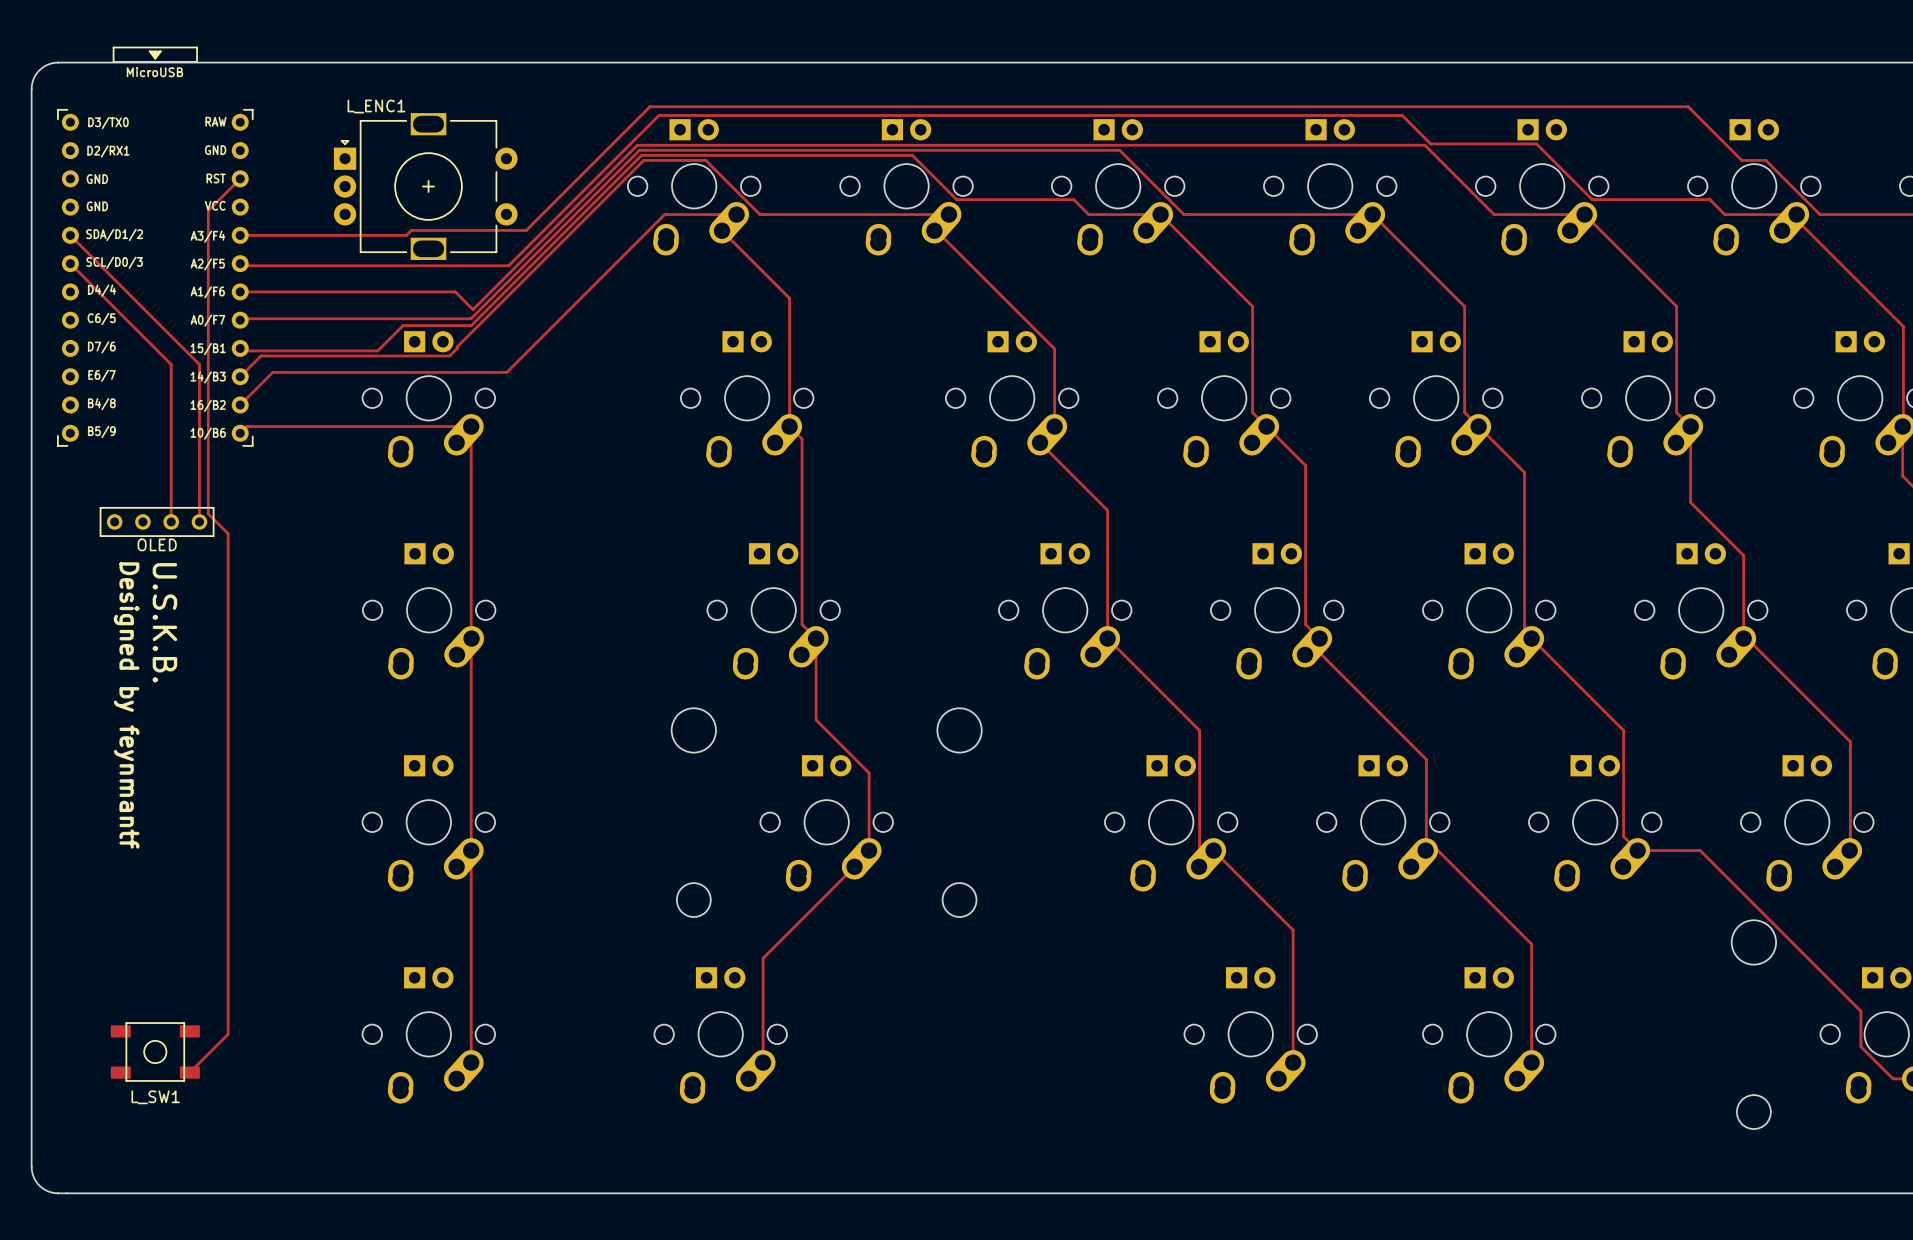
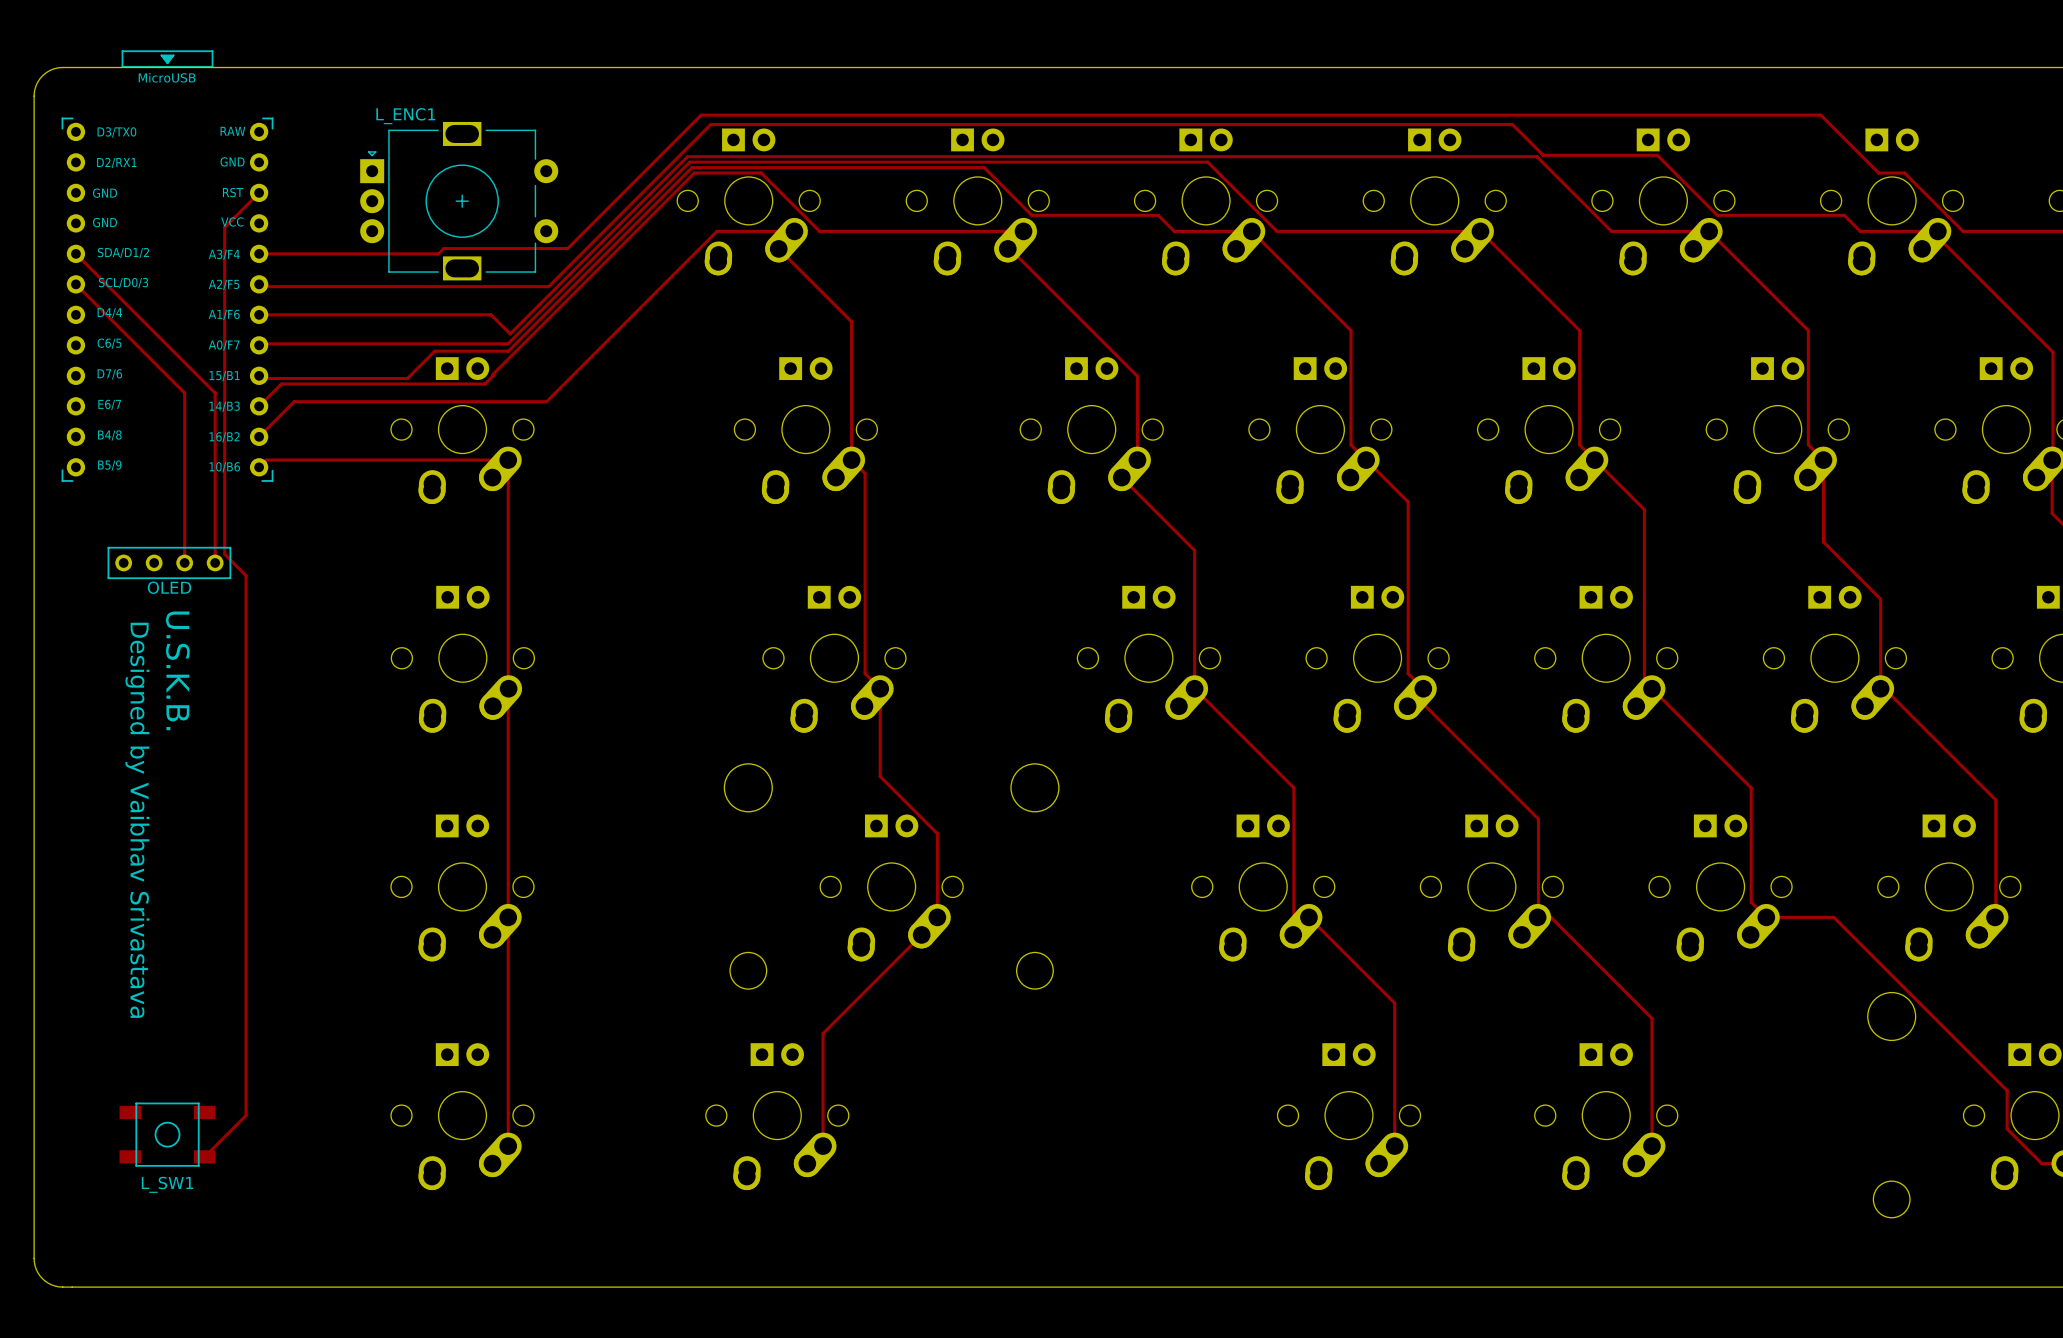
text: Designed by feynmantf (126, 705) -> none
text: none -> Designed by Vaibhav Srivastava (137, 820)

